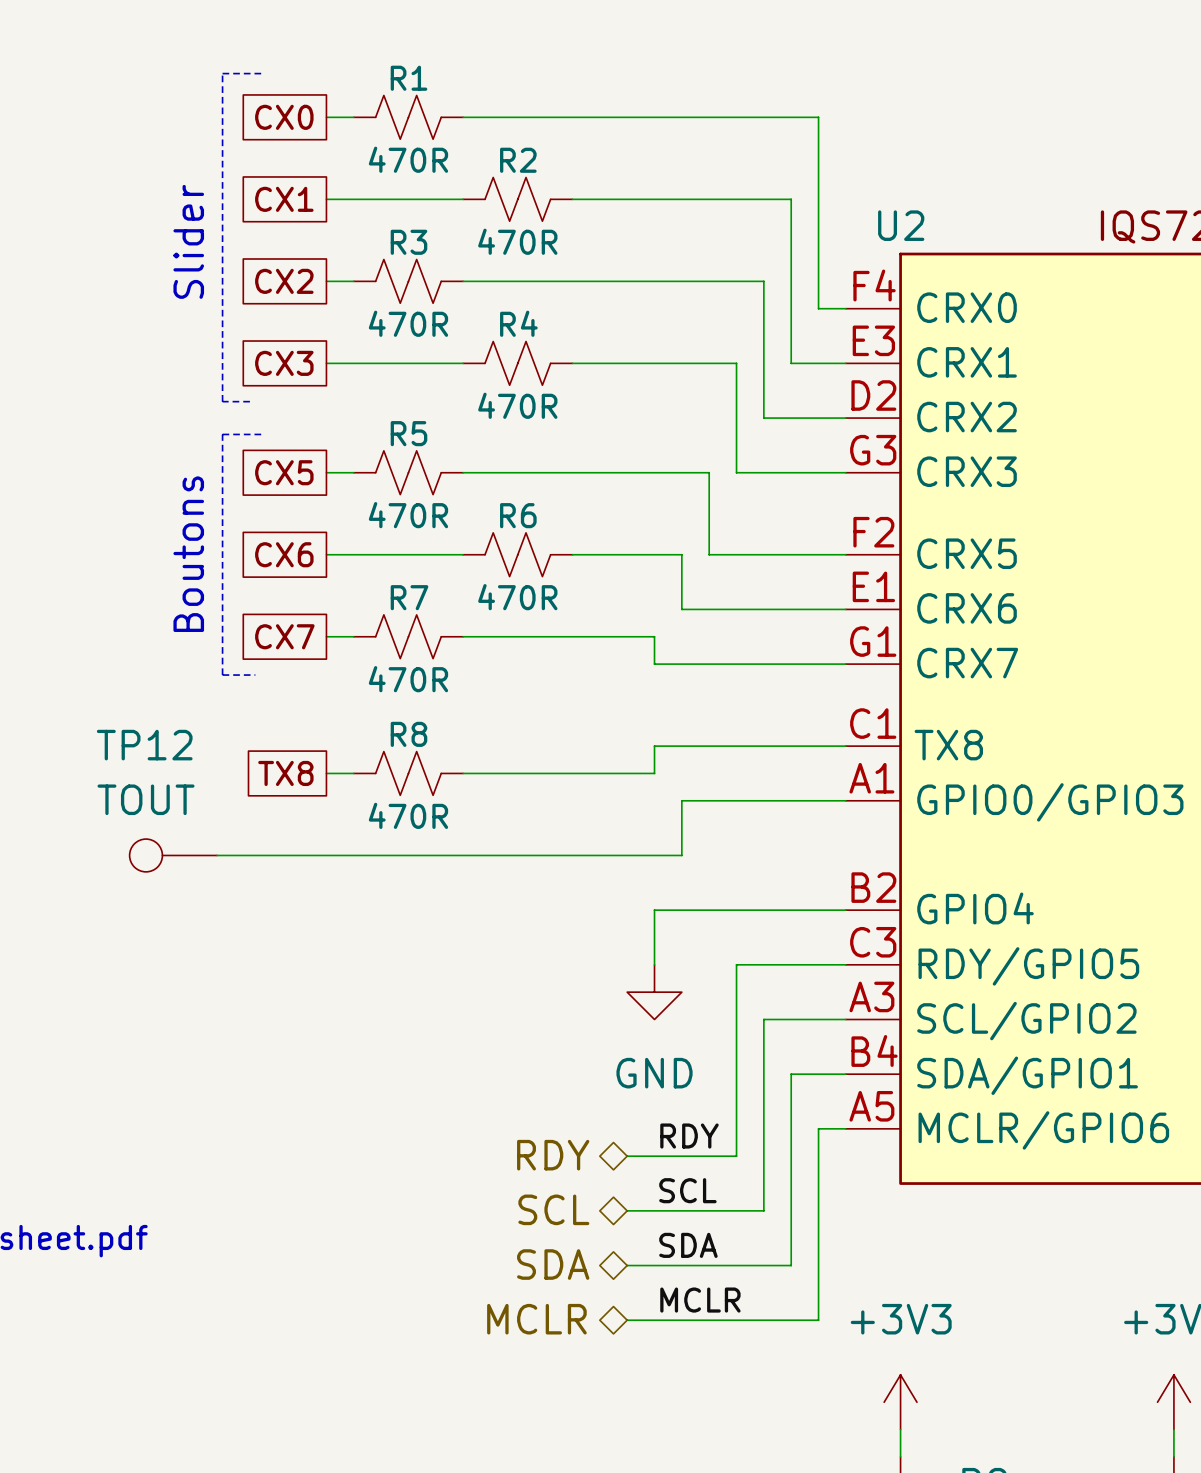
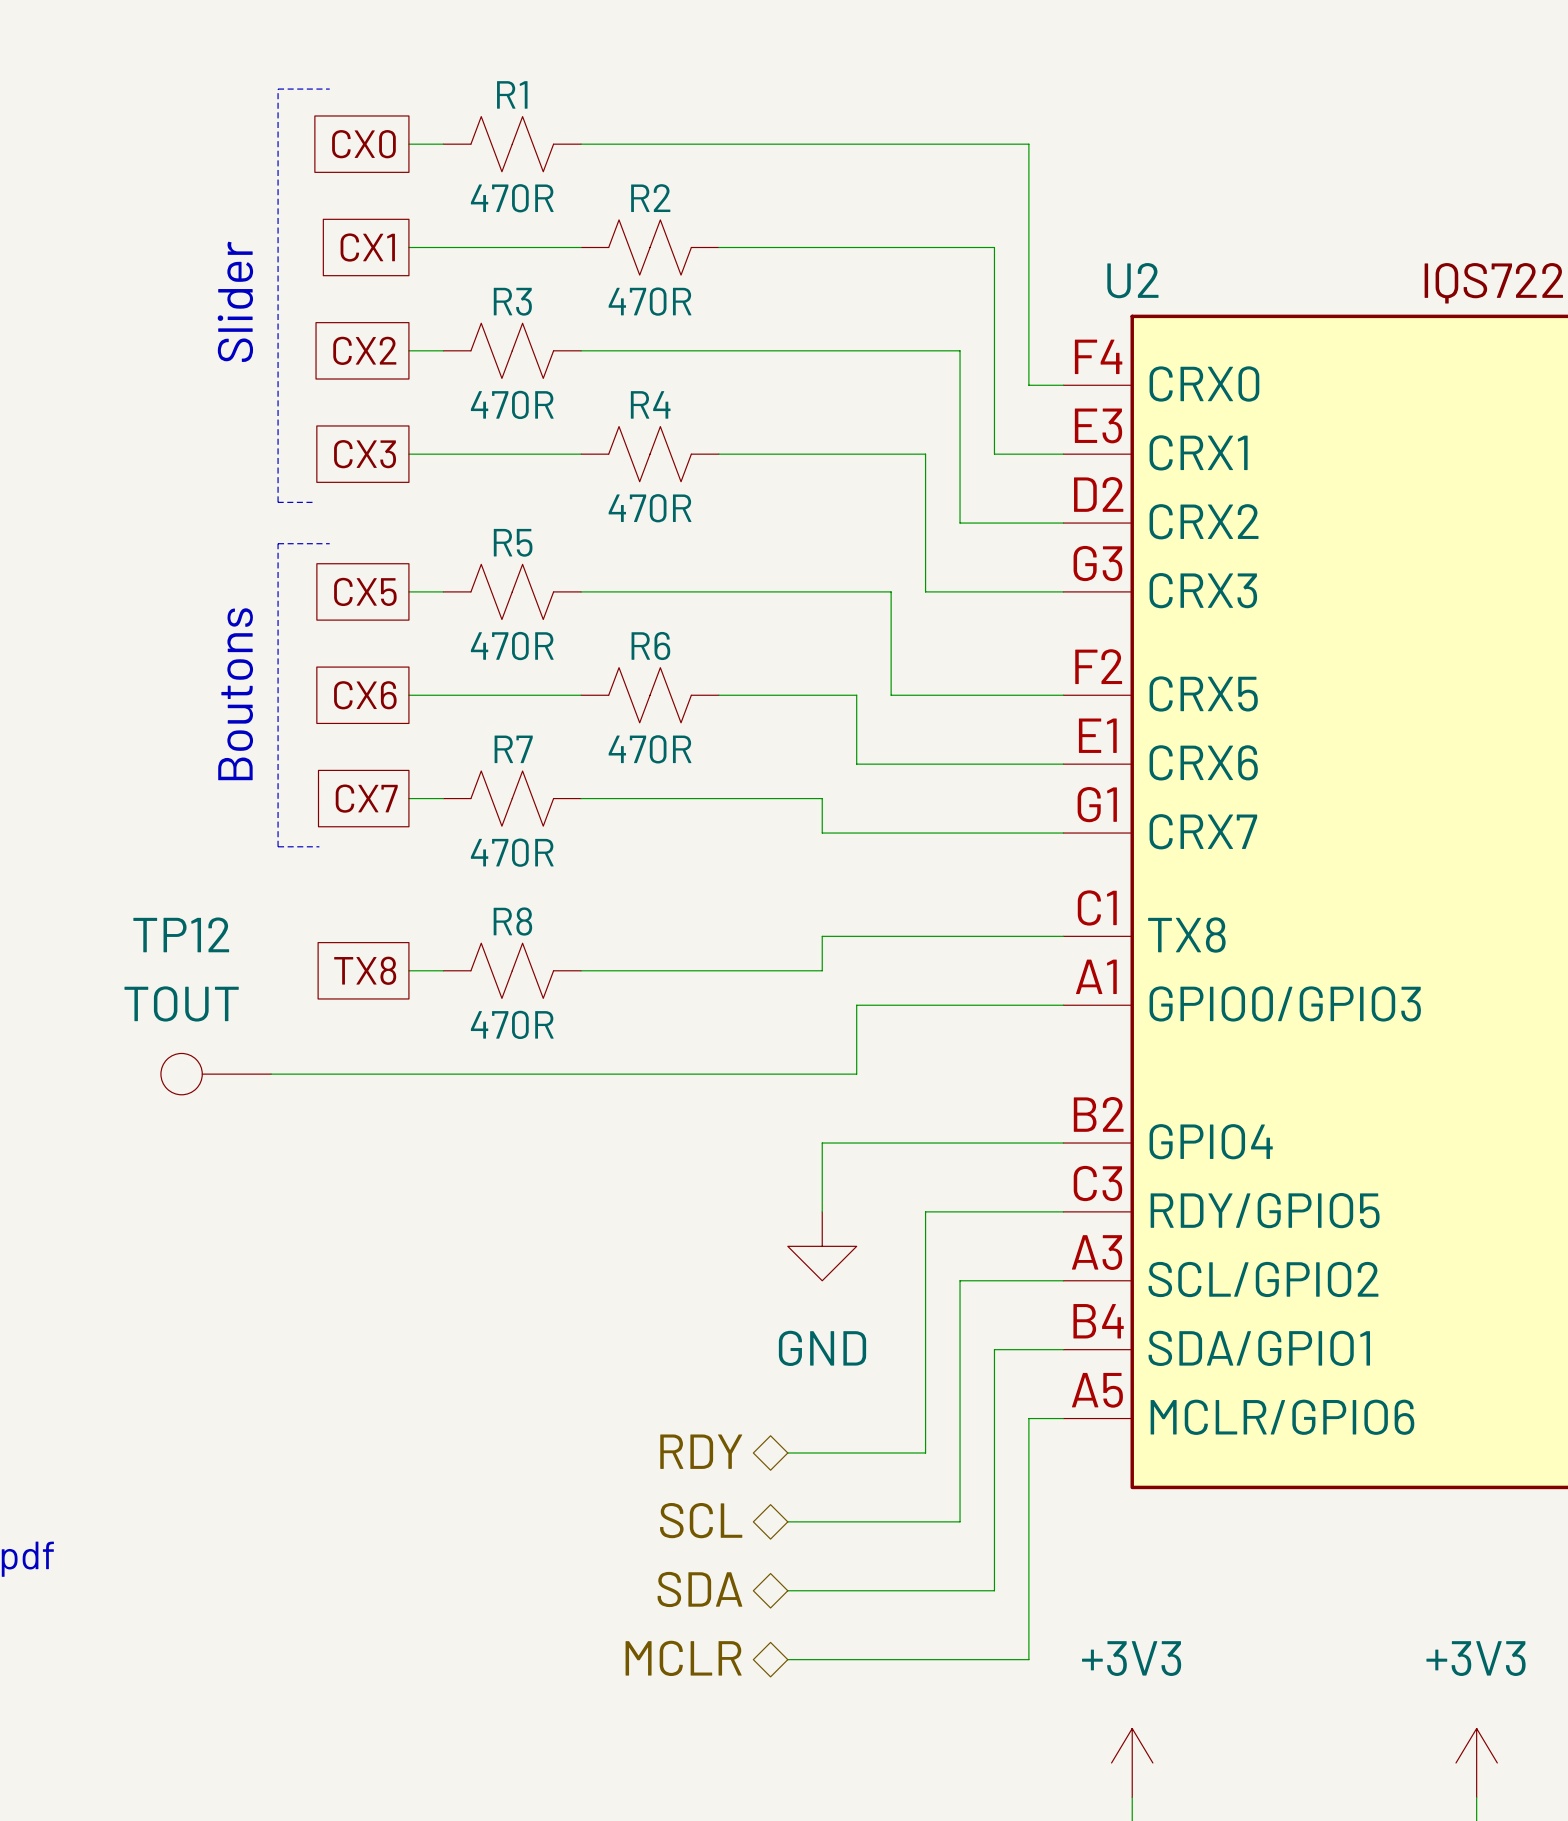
label: RDY (689, 1136) -> none
label: SCL (687, 1190) -> none
label: SDA (688, 1245) -> none
label: MCLR (700, 1300) -> none

